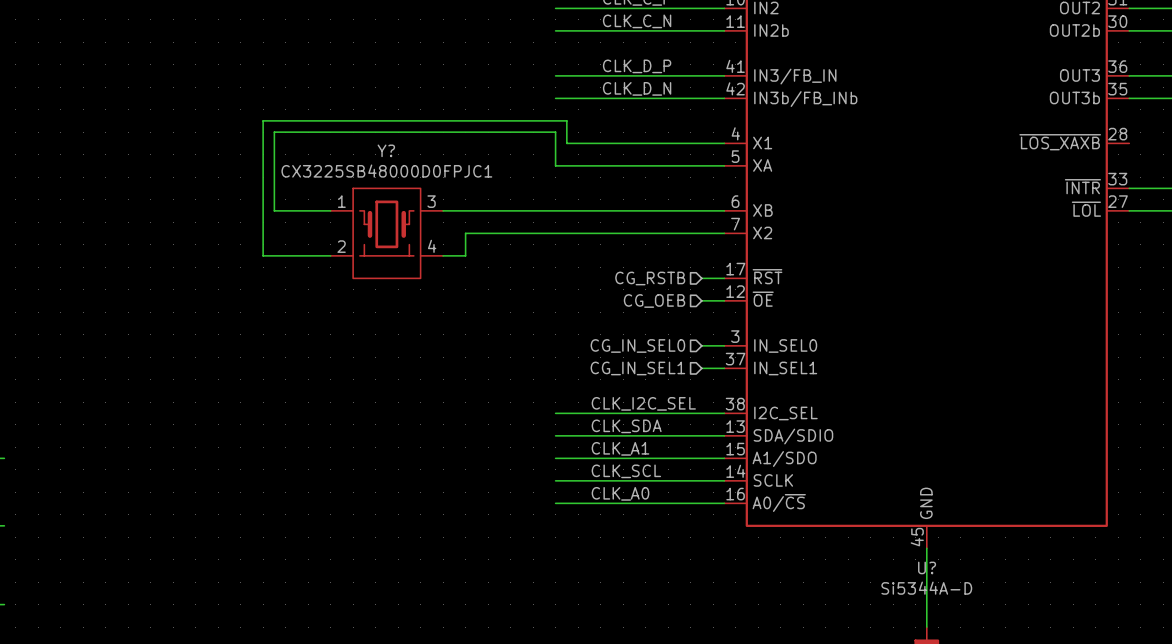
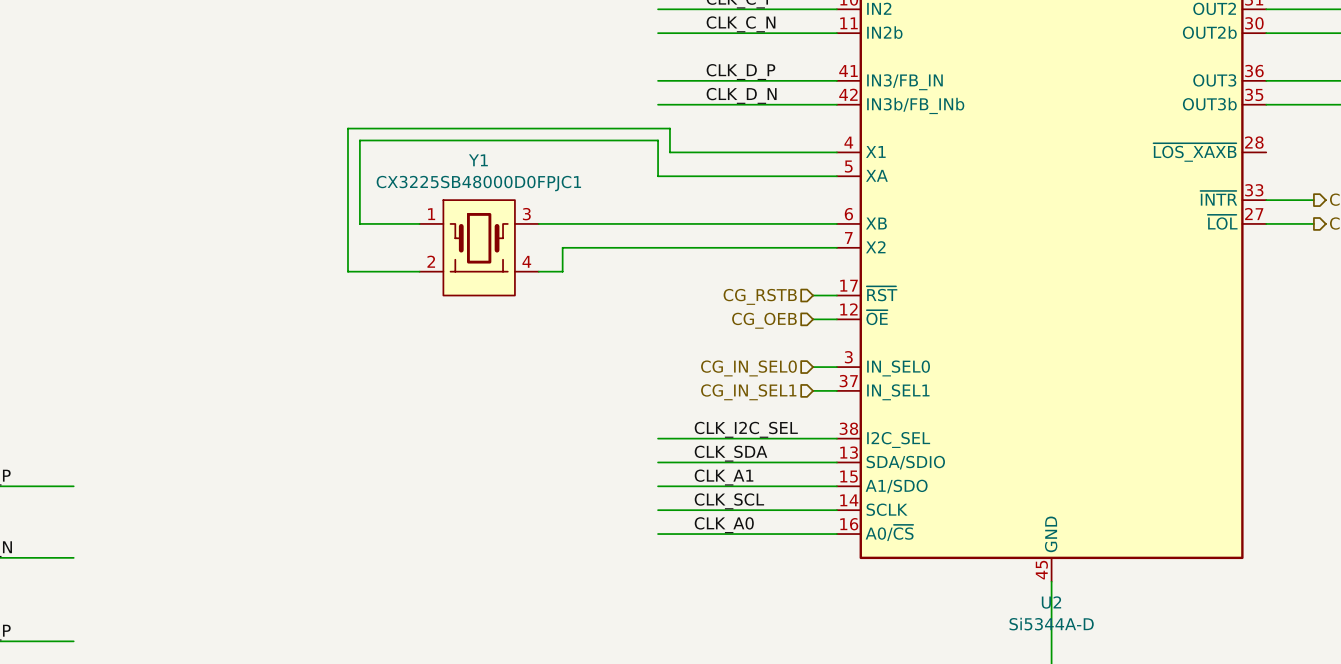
Y? name: Y? (386, 150) -> Y1 (478, 160)
U? name: U? (927, 567) -> U2 (1051, 602)

